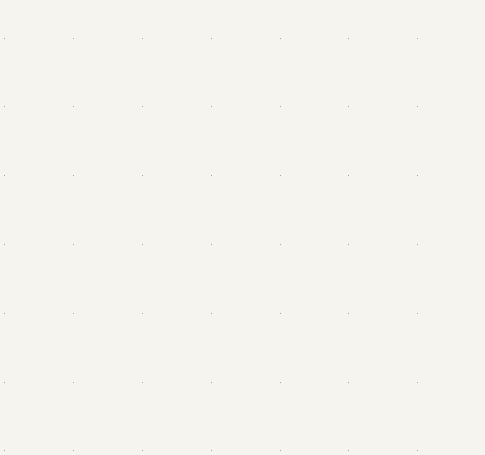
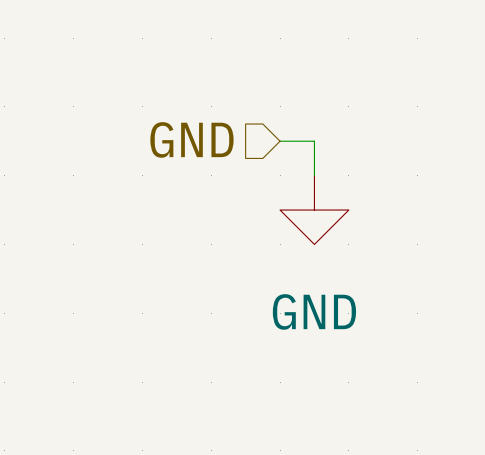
hierarchical label: none -> GND (191, 139)
wire: none -> (280, 141) (314, 141) (314, 175)
power symbol: none -> GND (314, 210)

